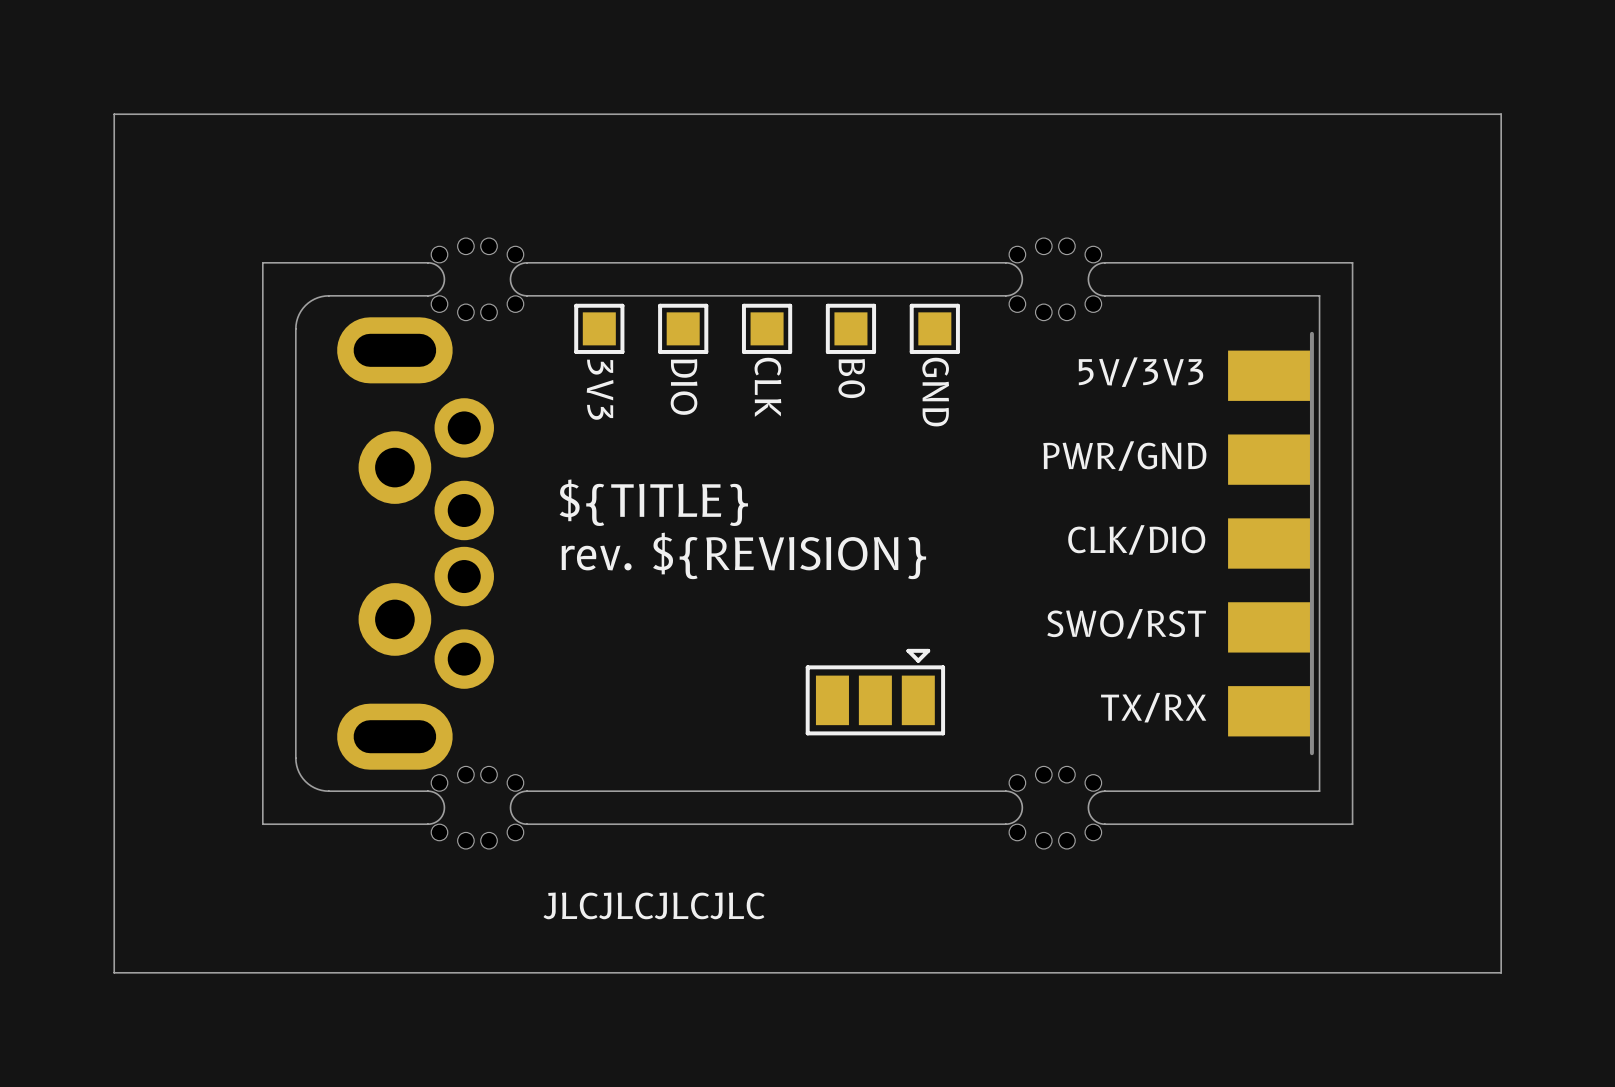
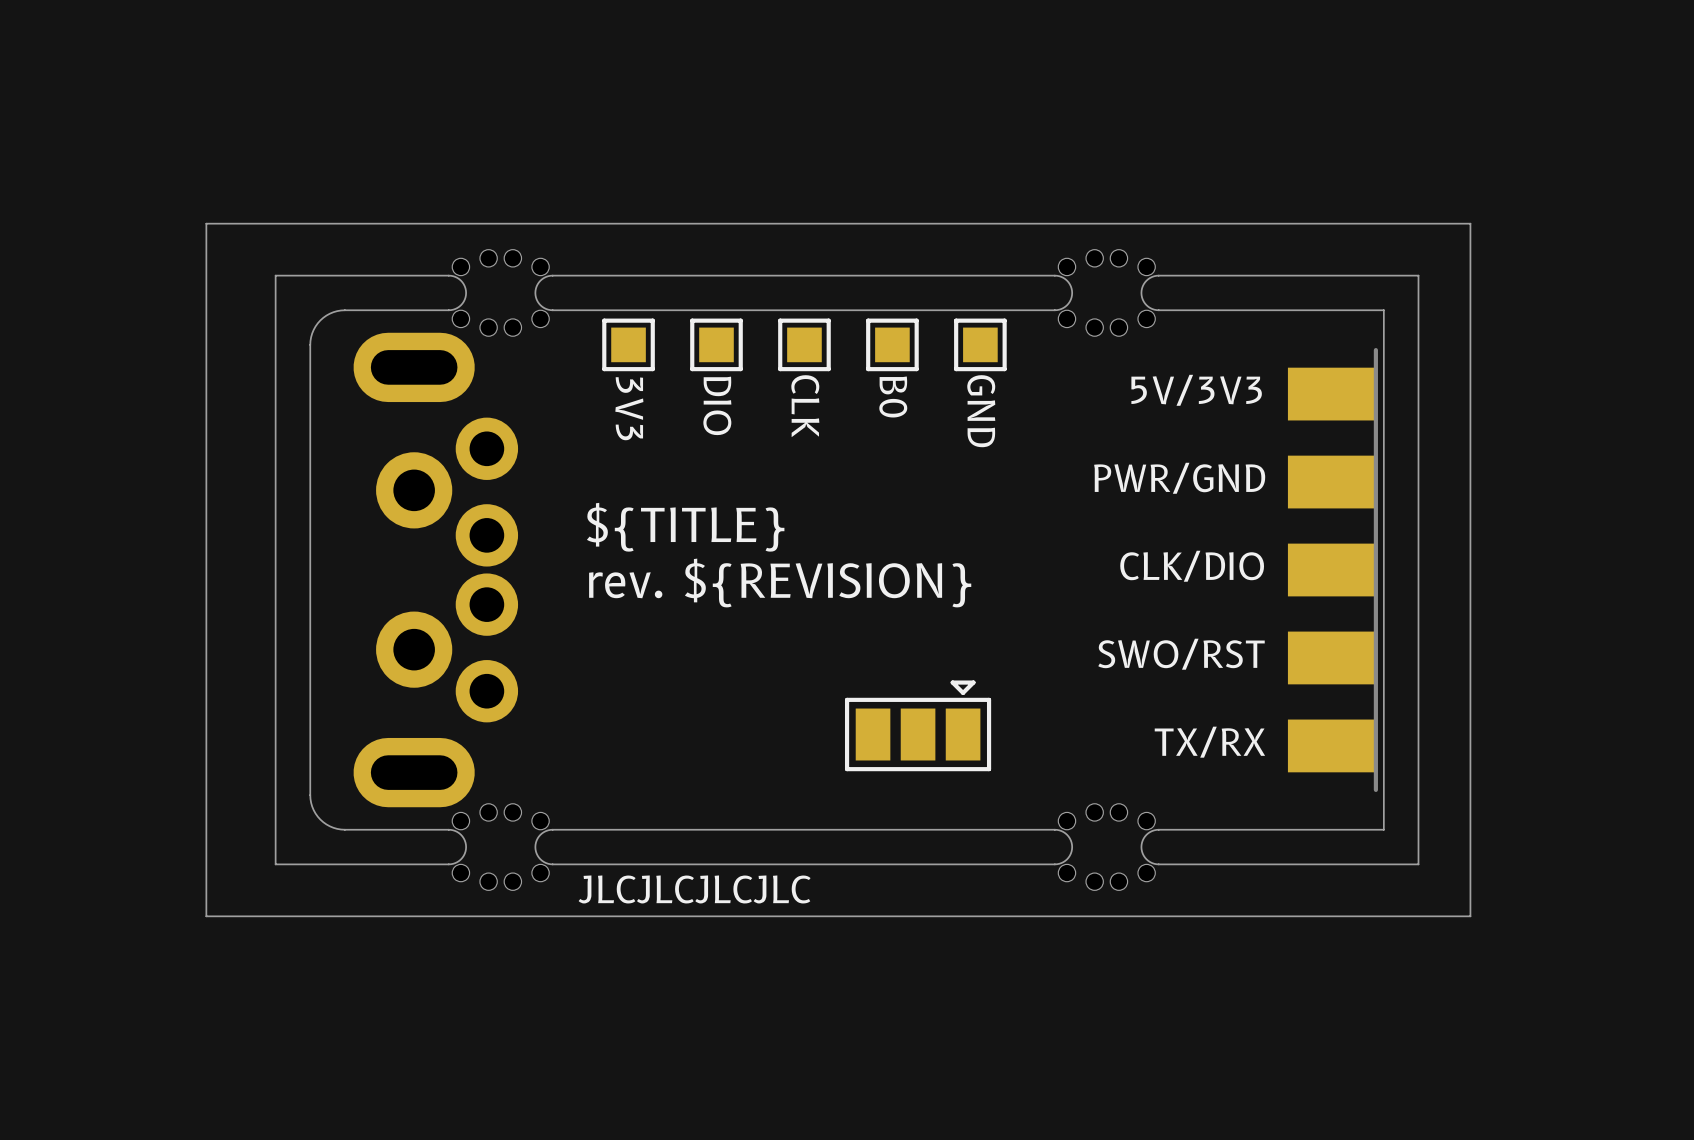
board edge: (1501, 114) (114, 114) (114, 972) (1501, 972) (1501, 114) -> (1470, 223) (1470, 916) (206, 916) (206, 223) (1470, 223)
text position: JLCJLCJLCJLC (654, 905) -> JLCJLCJLCJLC (694, 889)

